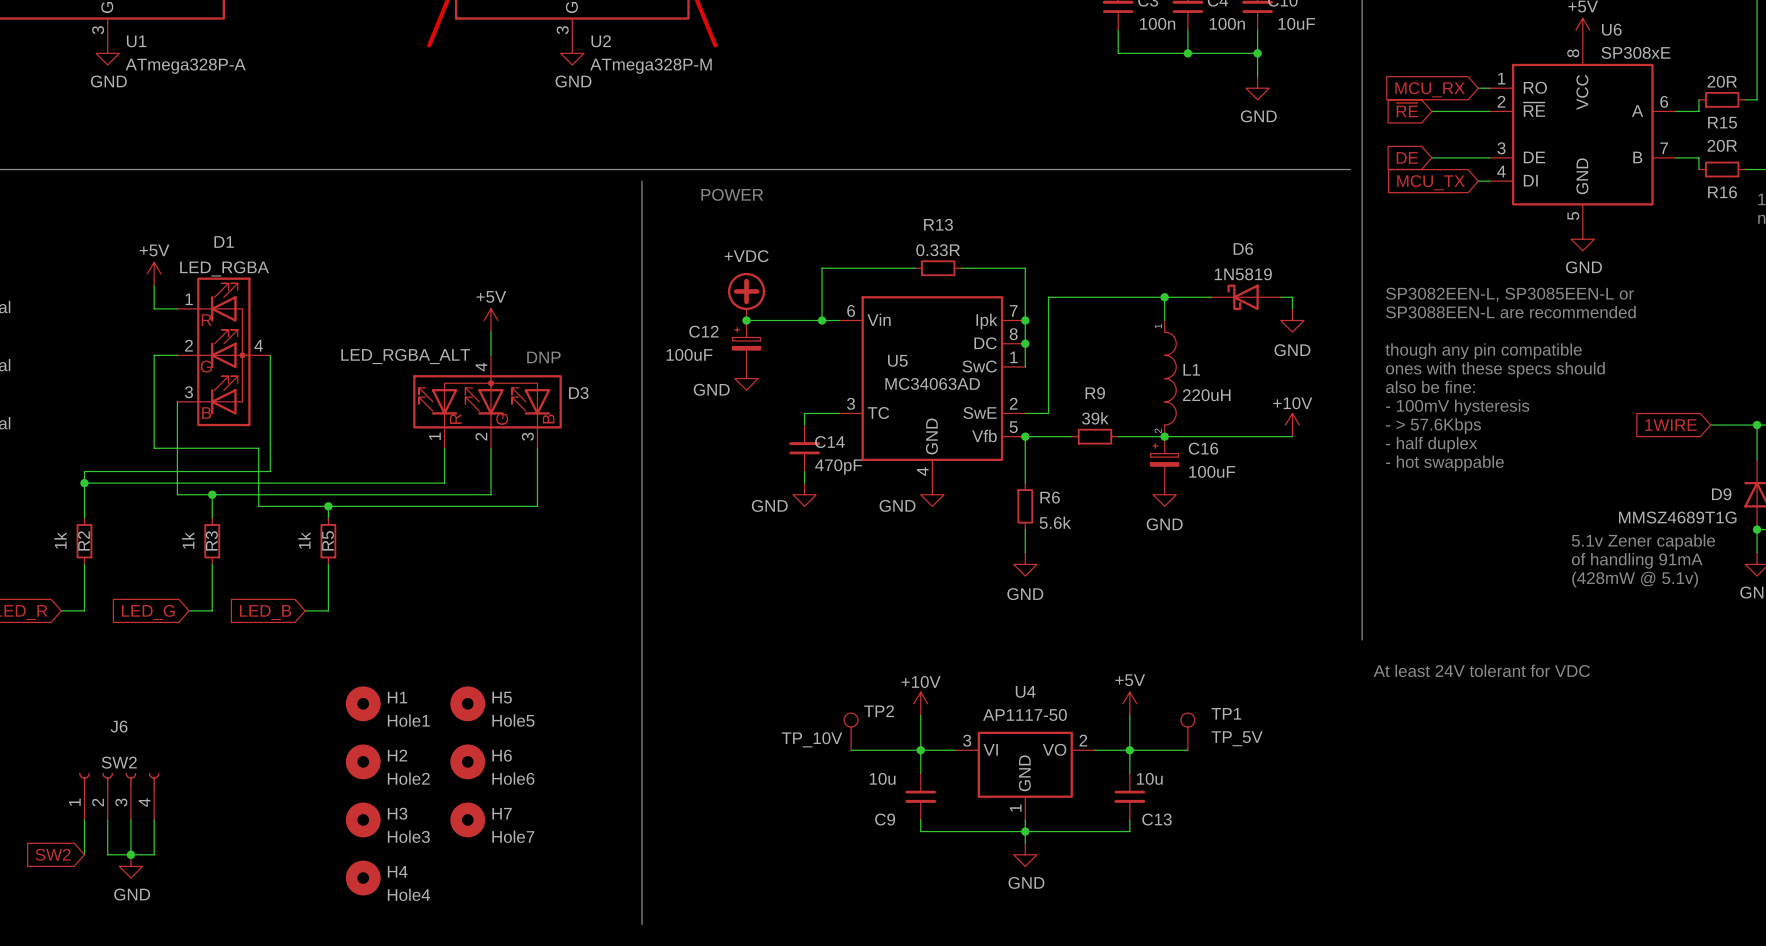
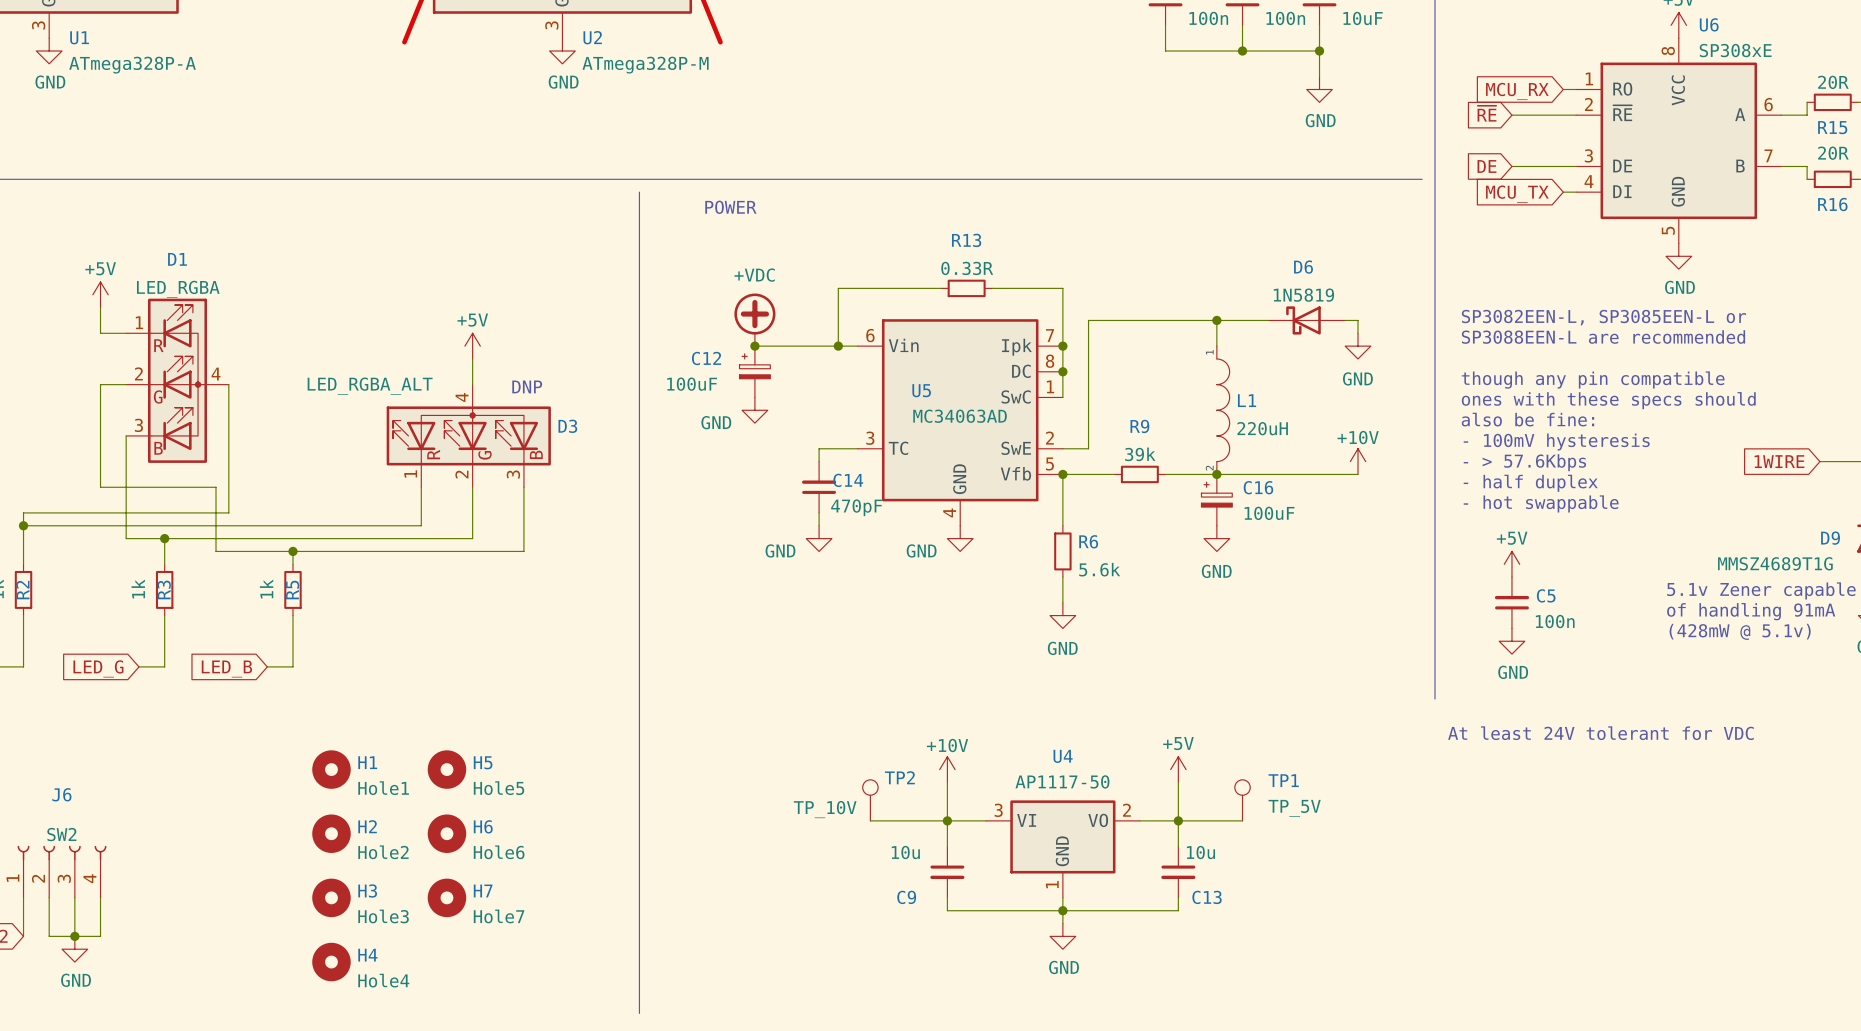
power symbol: none -> +5V (1511, 564)
C5: none -> 100n (1511, 602)
power symbol: none -> GND (1511, 641)

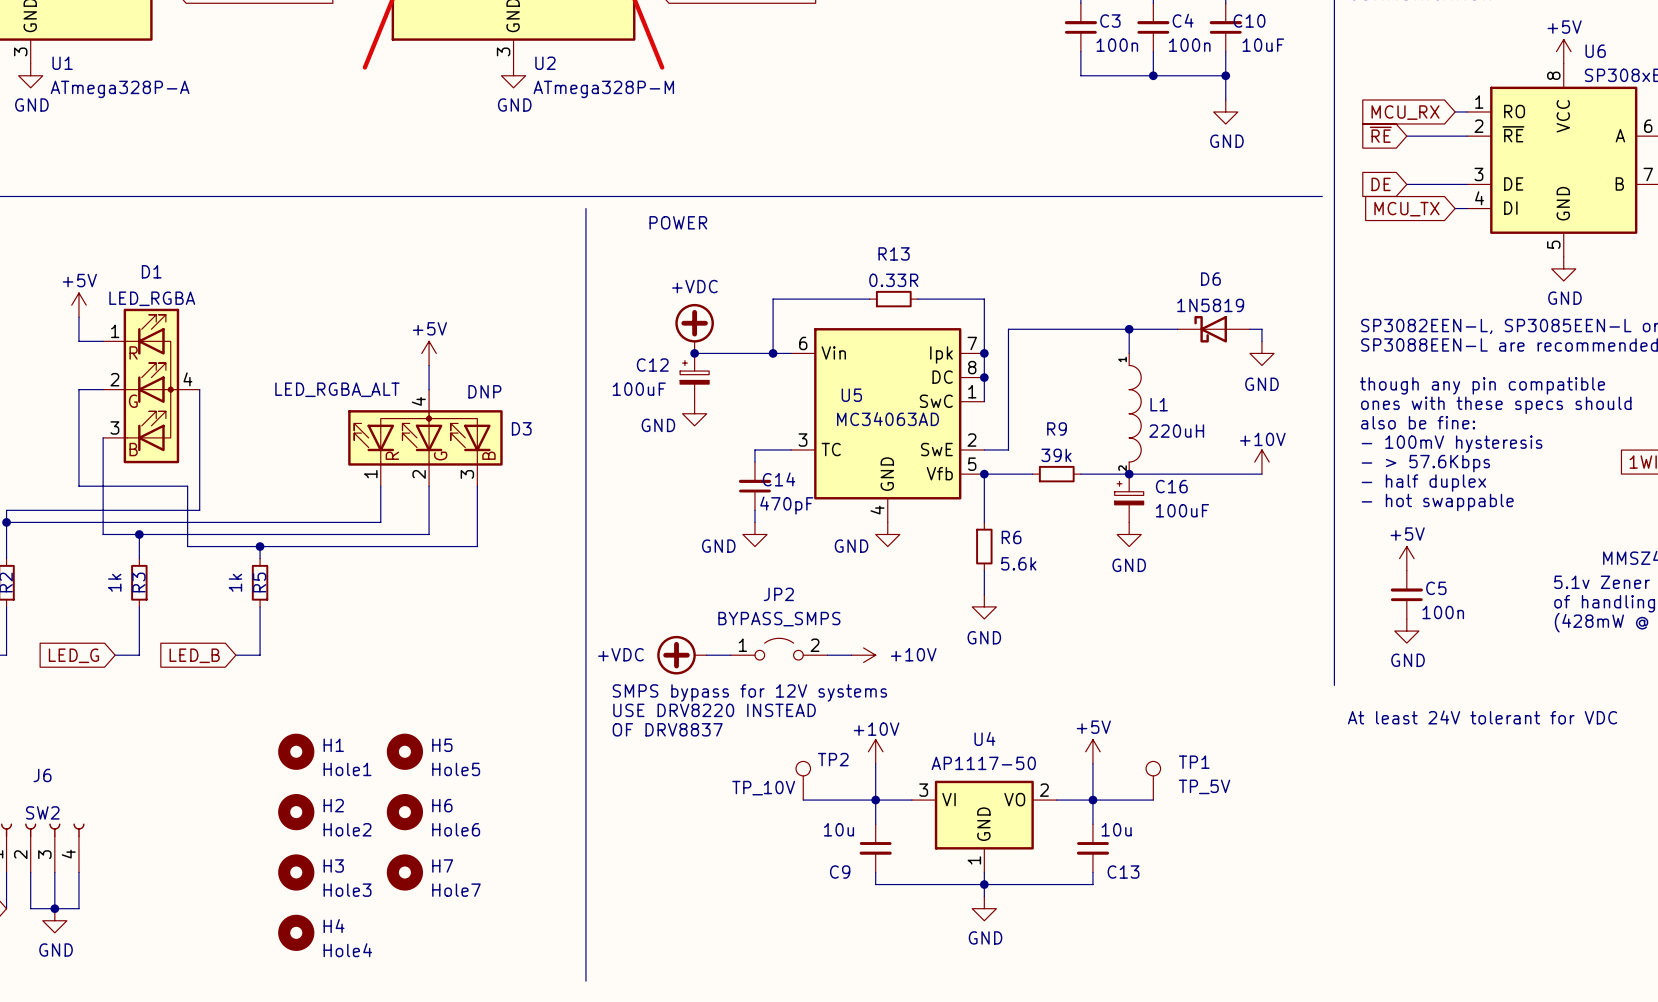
JP2: none -> BYPASS_SMPS (779, 649)
power symbol: none -> +VDC (681, 655)
wire: none -> (706, 655) (730, 655)
wire: none -> (827, 655) (851, 655)
power symbol: none -> +10V (863, 655)
text: none -> SMPS bypass for 12V systems (749, 692)
text: none -> USE DRV8220 INSTEAD (714, 710)
text: none -> OF DRV8837 (667, 729)

